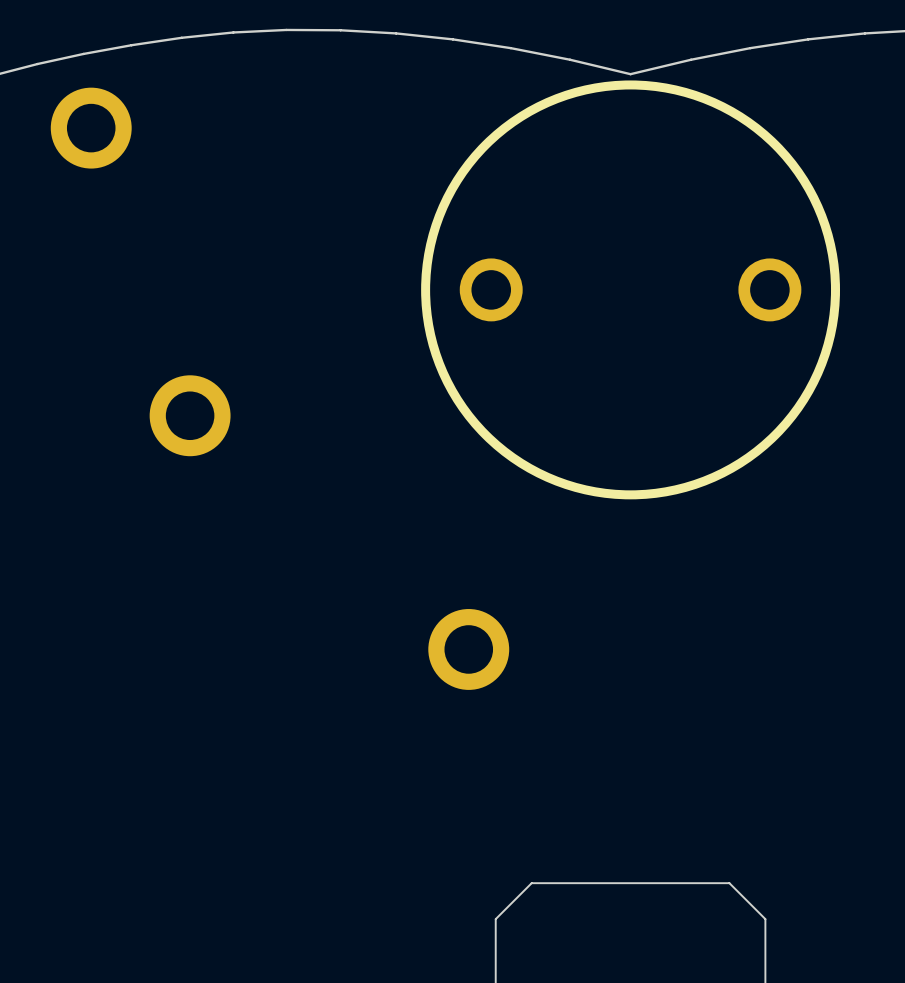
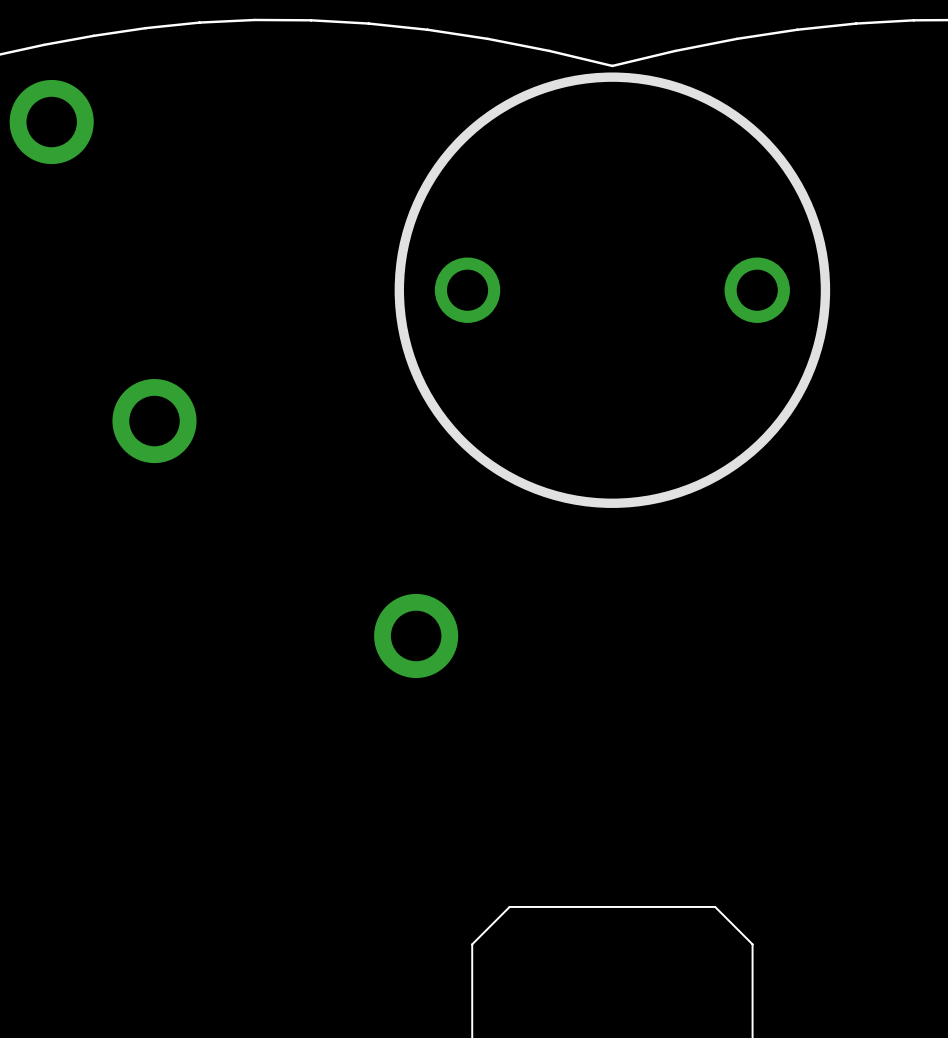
part position: (468, 649) -> (416, 635)

